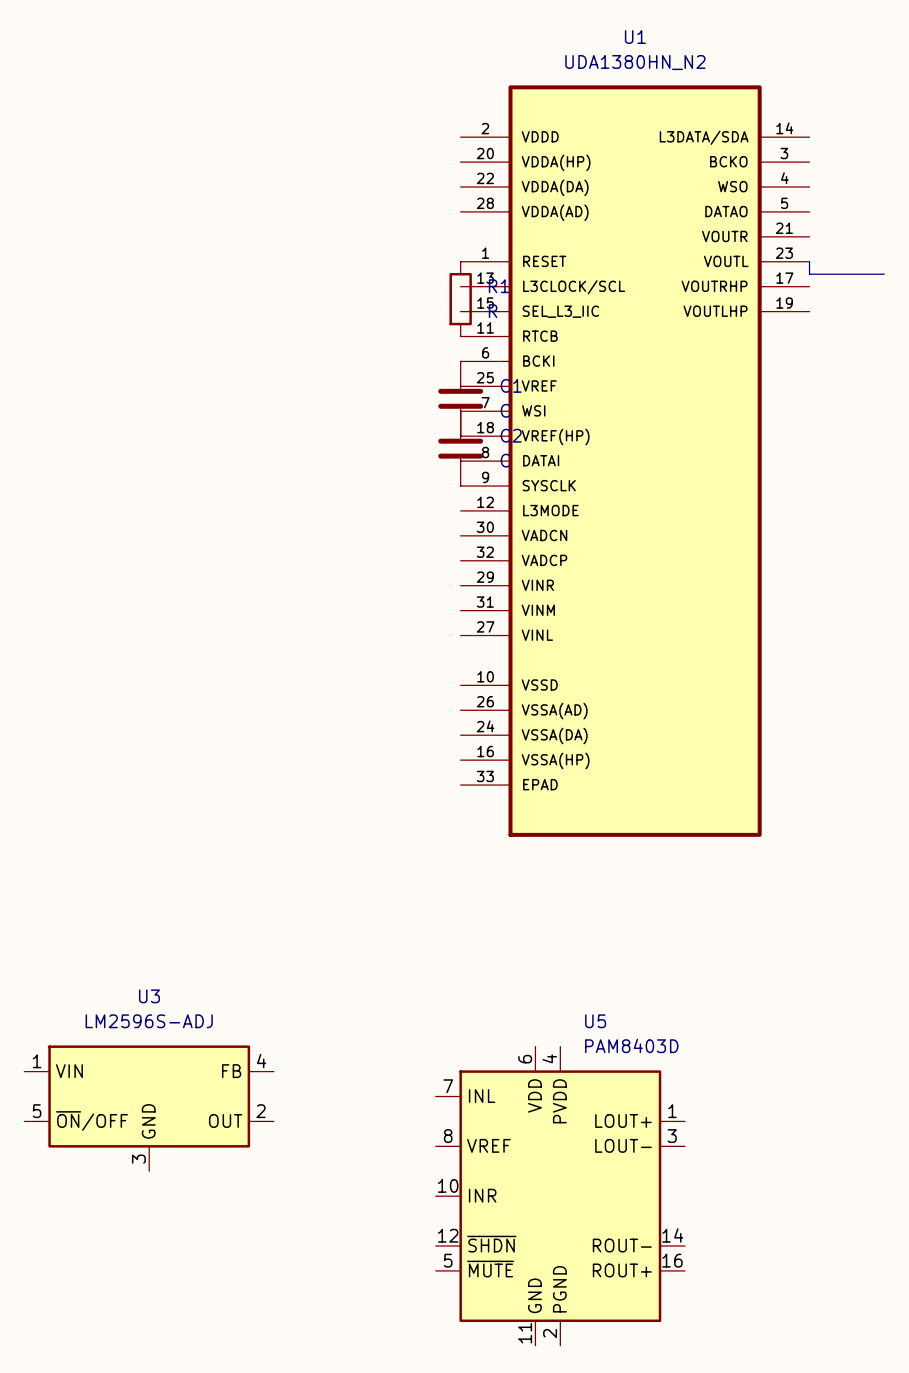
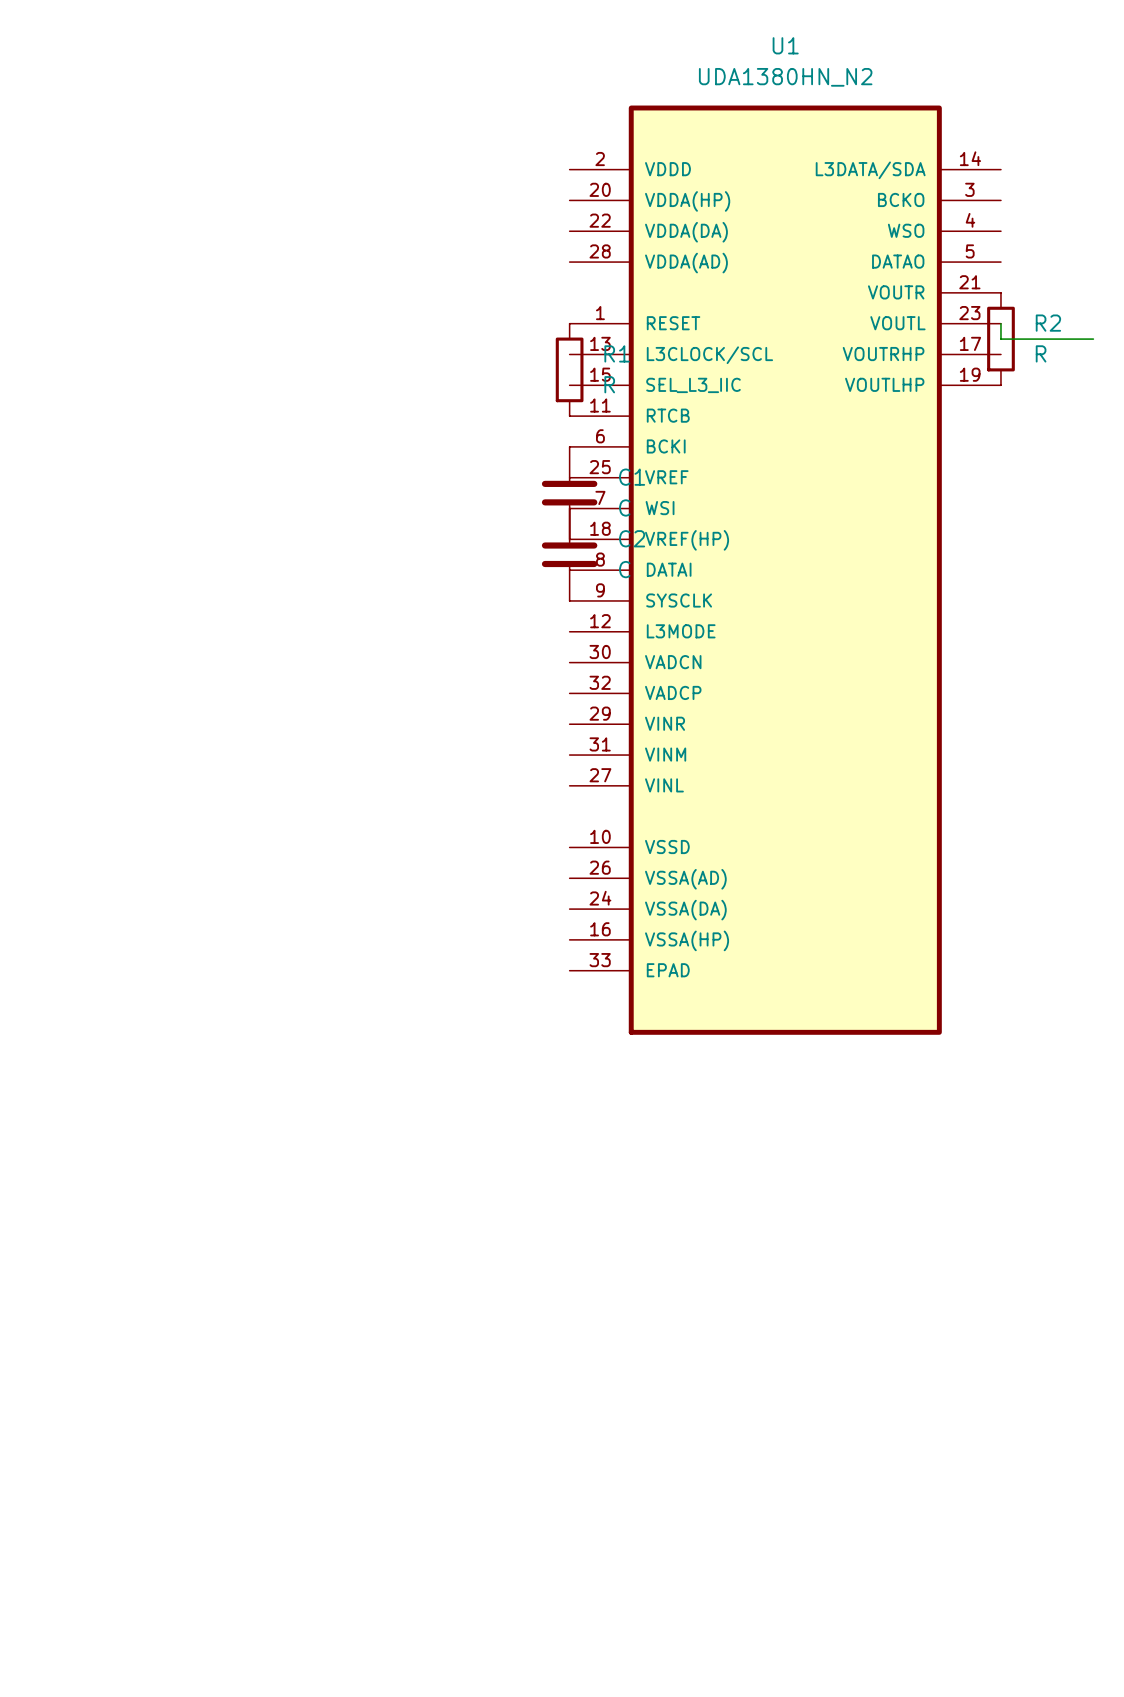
R2: none -> R (1000, 339)
U3: LM2596S-ADJ (149, 1108) -> none
U5: PAM8403D (560, 1196) -> none

